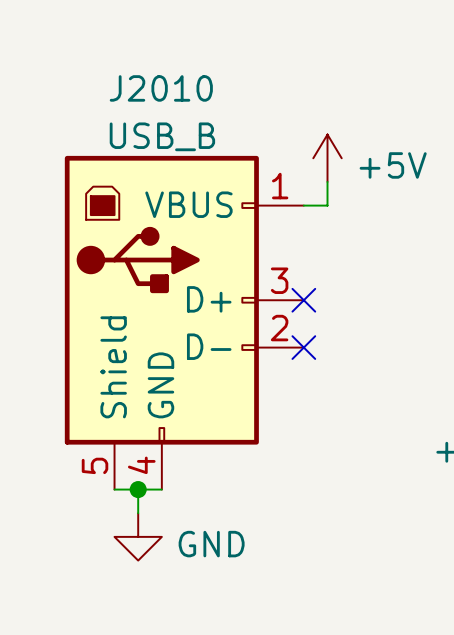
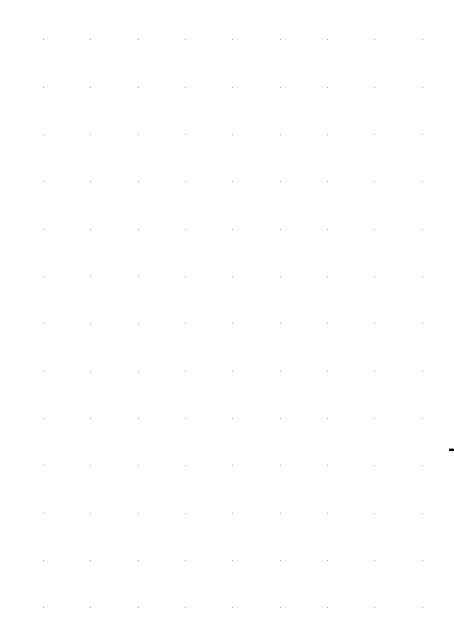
power symbol: +5V (327, 158) -> none
wire: (327, 181) (327, 205) (303, 205) -> none
no-connect mark: (303, 300) -> none
J2010: USB_B (184, 322) -> none
no-connect mark: (303, 347) -> none
wire: (114, 489) (161, 489) -> none
wire: (138, 489) (138, 513) -> none
junction: (138, 489) -> none
power symbol: GND (138, 536) -> none

